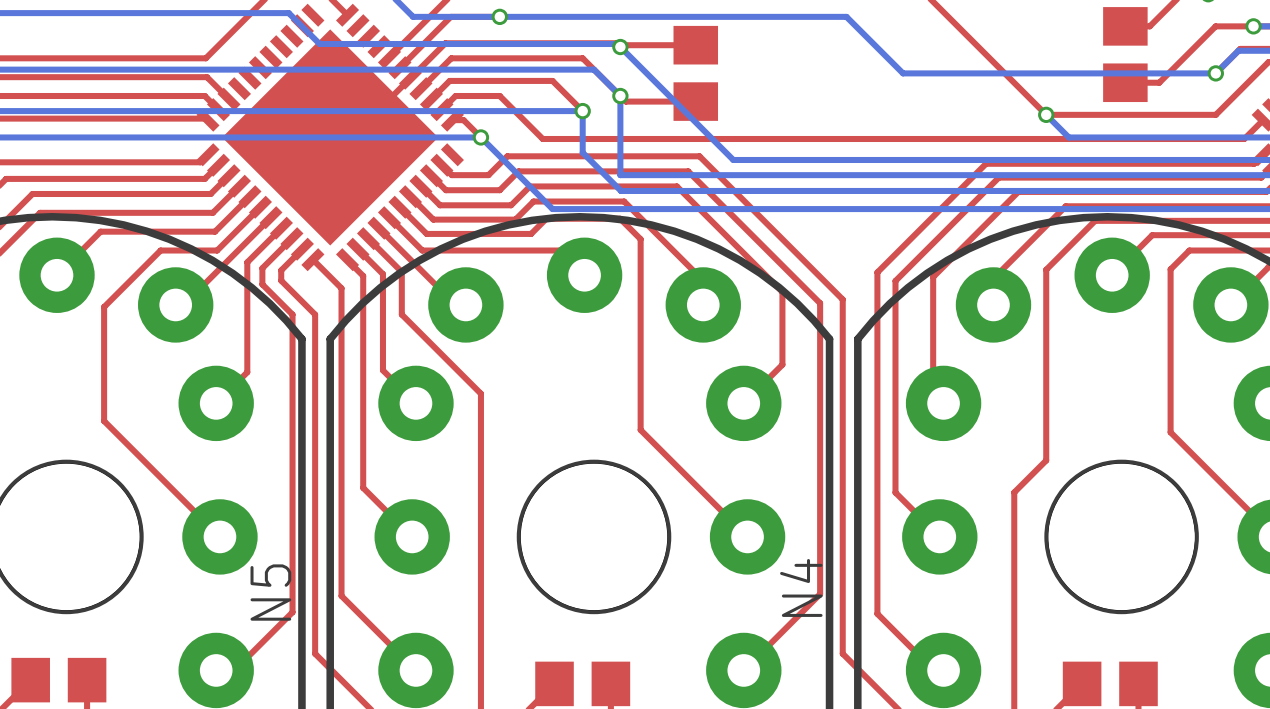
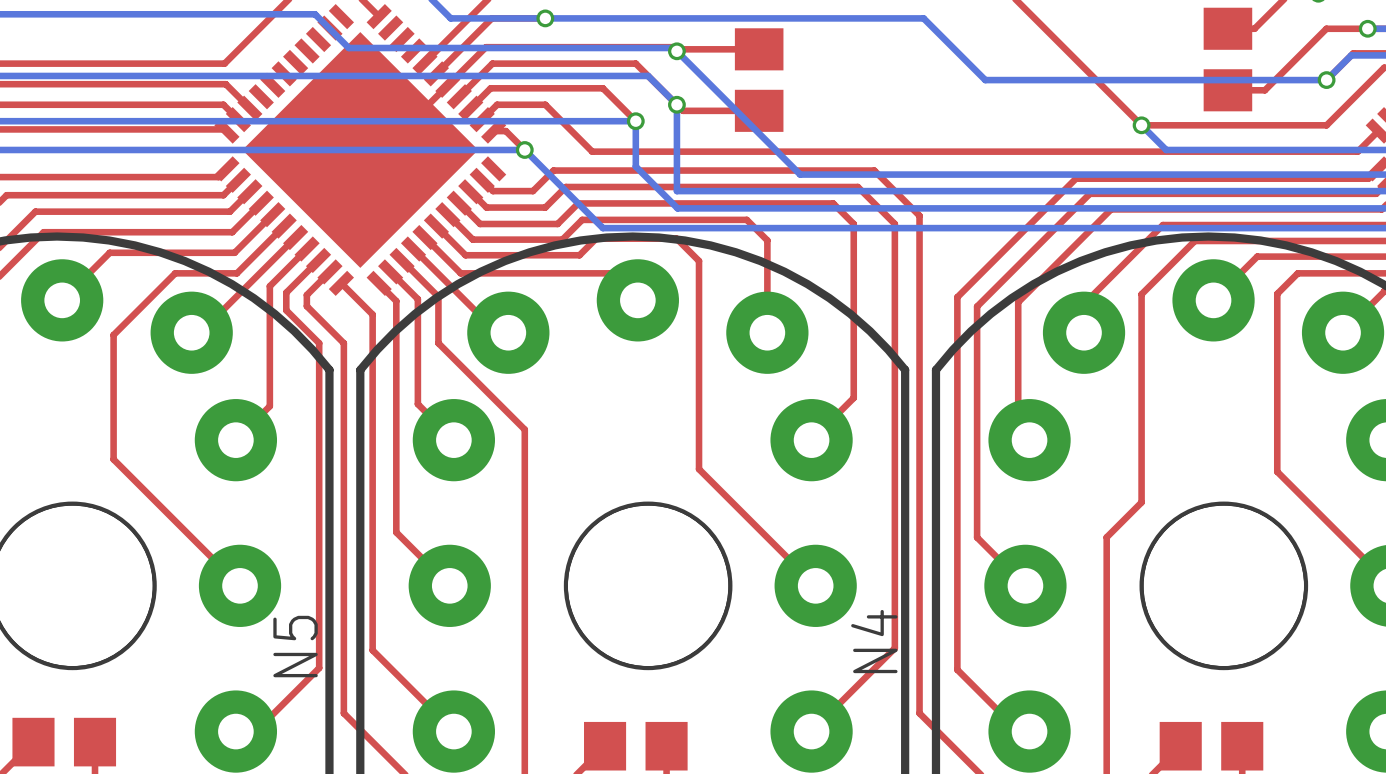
top track: (699, 156) (842, 299) -> (763, 170) (874, 170) (919, 215) (919, 326)
top track: (688, 171) (820, 303) -> (750, 186) (857, 186) (894, 224) (894, 330)
top track: (676, 186) (782, 291) -> (738, 203) (833, 203) (853, 224) (853, 318)
top track: (624, 201) (703, 280) -> (681, 219) (746, 219) (767, 240) (767, 306)

